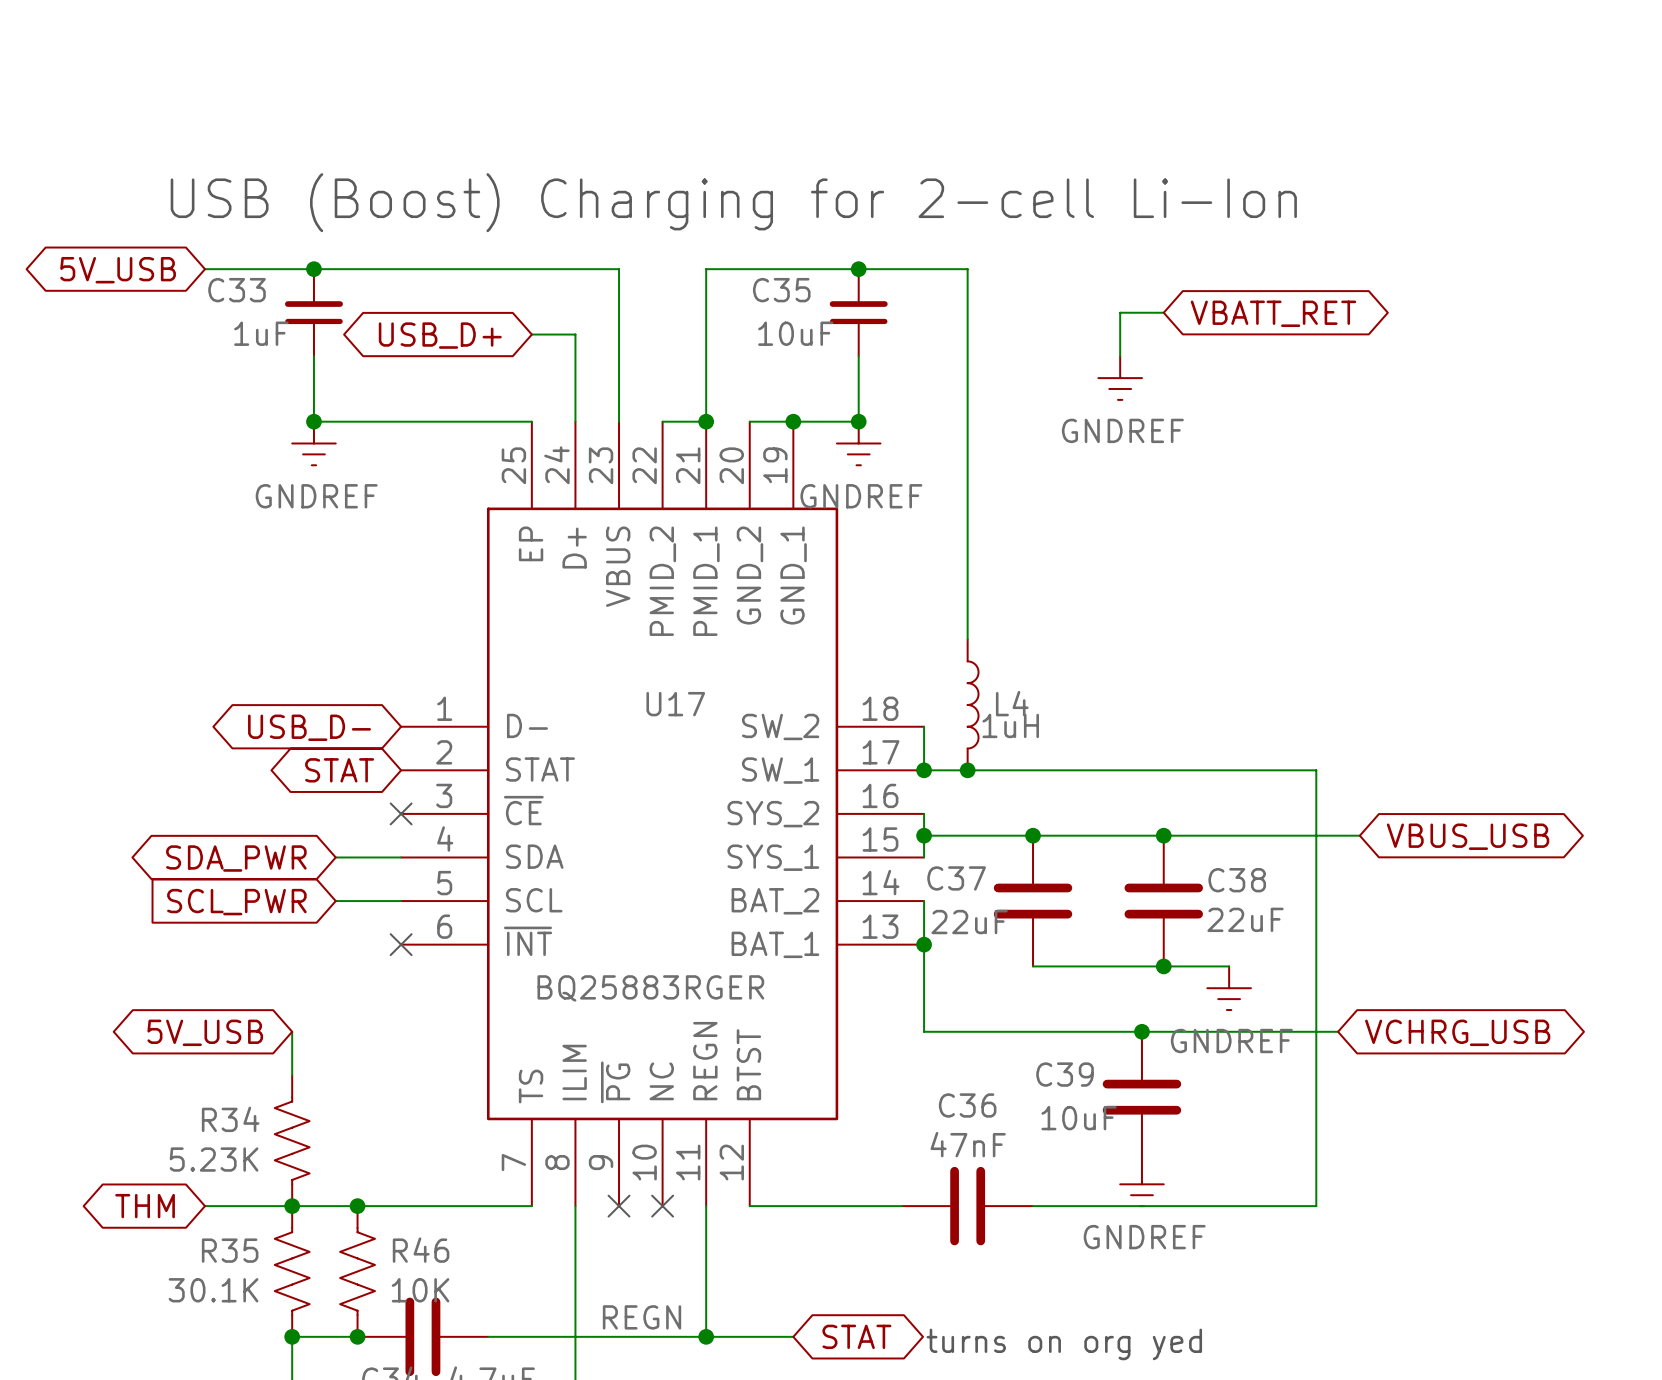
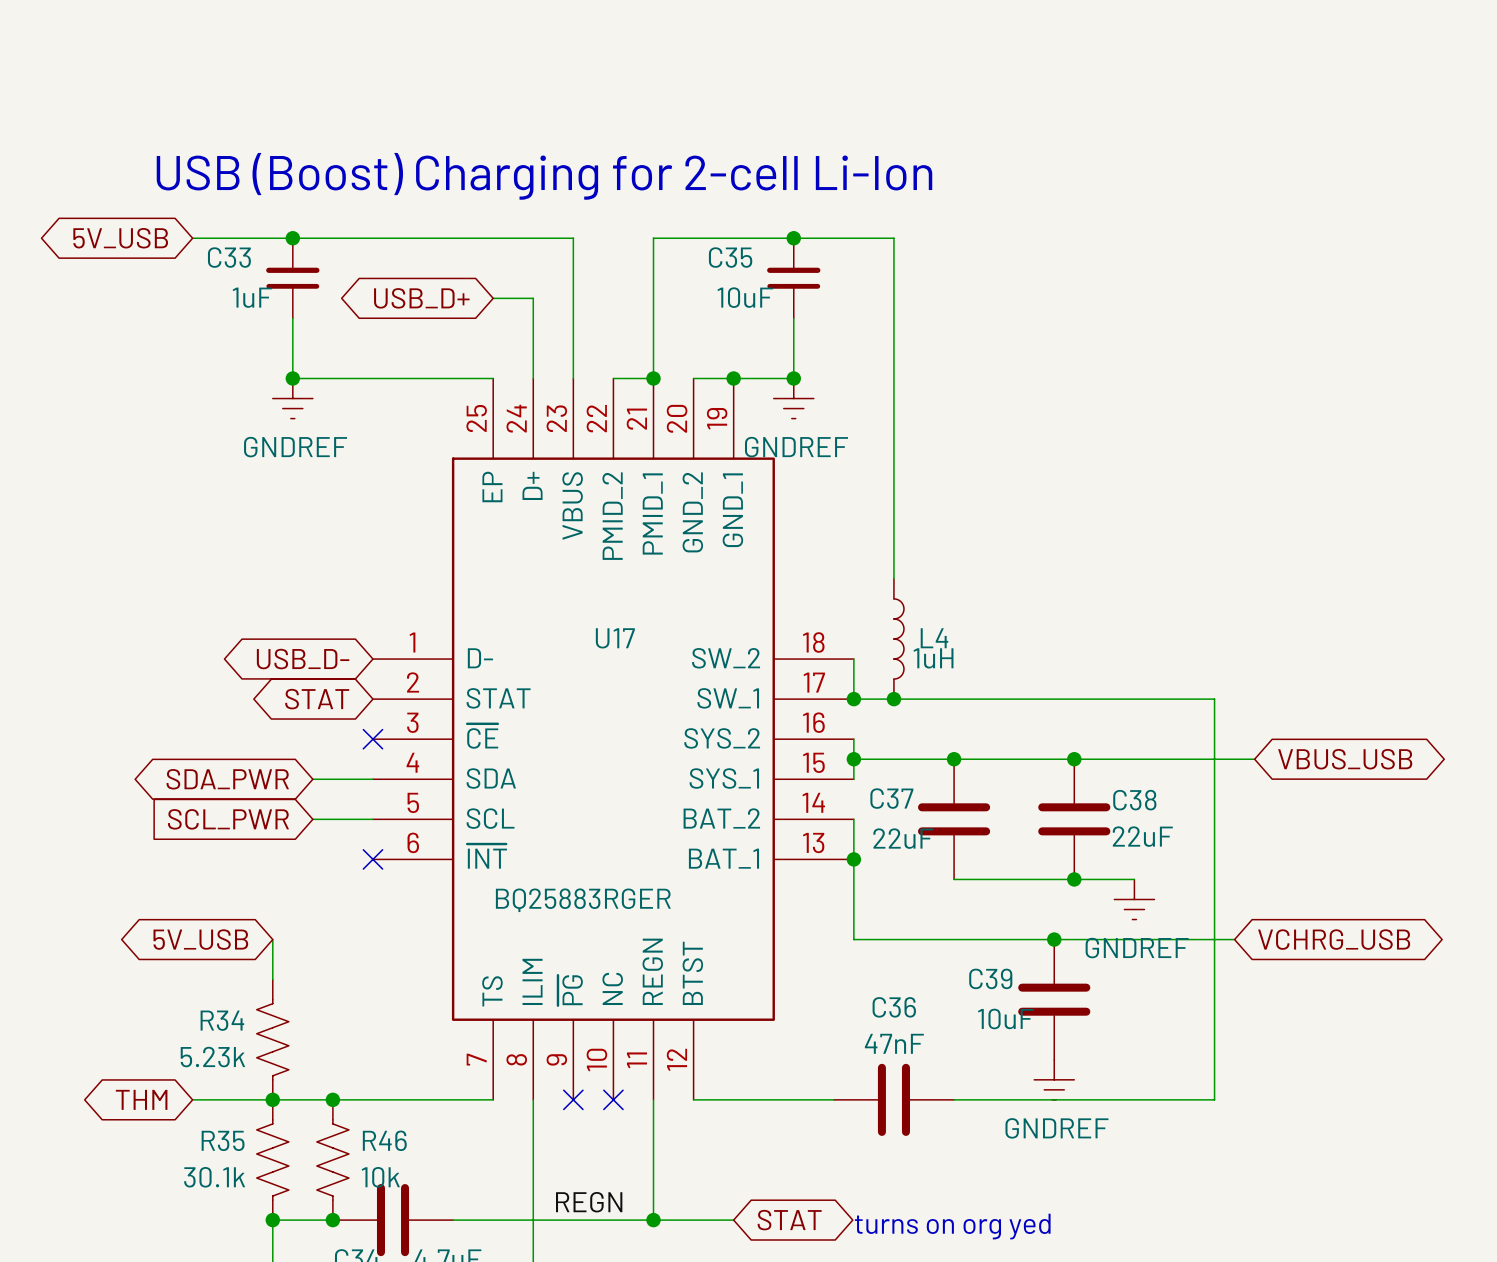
wire: (1163, 312) (1120, 312) (1120, 356) -> none
global label: VBATT_RET (1273, 313) -> none
power symbol: GNDREF (1120, 378) -> none
R34 value: 5.23K (214, 1159) -> 5.23k (212, 1057)
R35 value: 30.1K (213, 1290) -> 30.1k (214, 1177)
R46 value: 10K (420, 1290) -> 10k (380, 1177)

